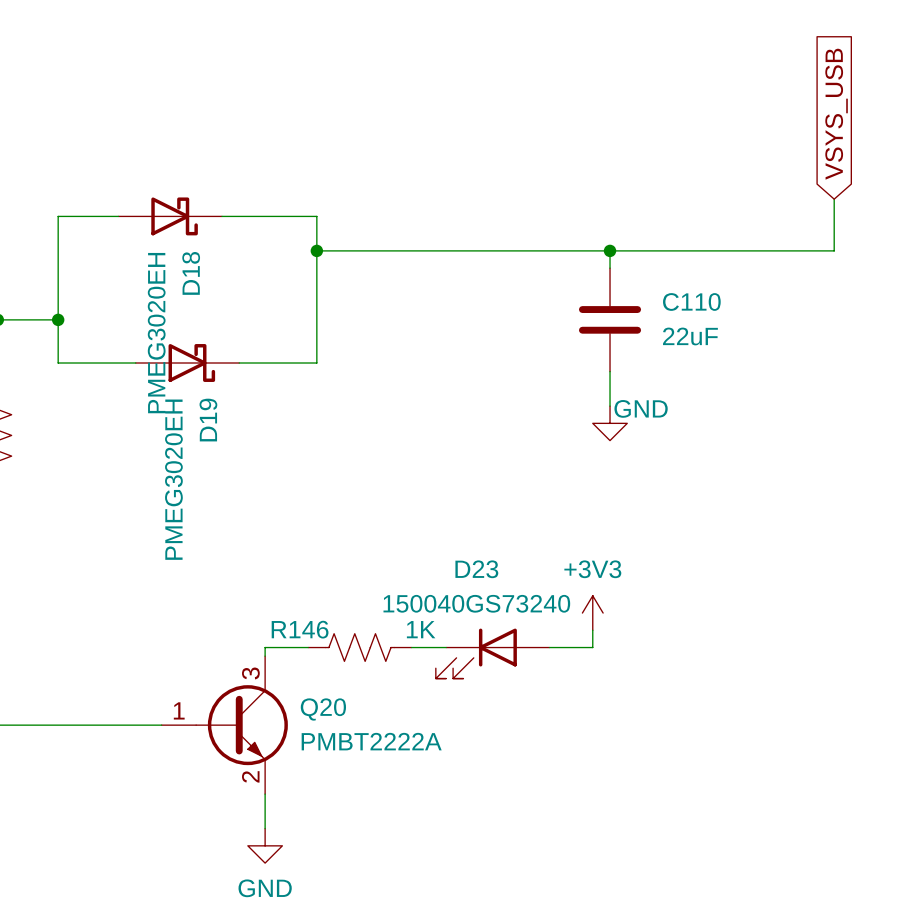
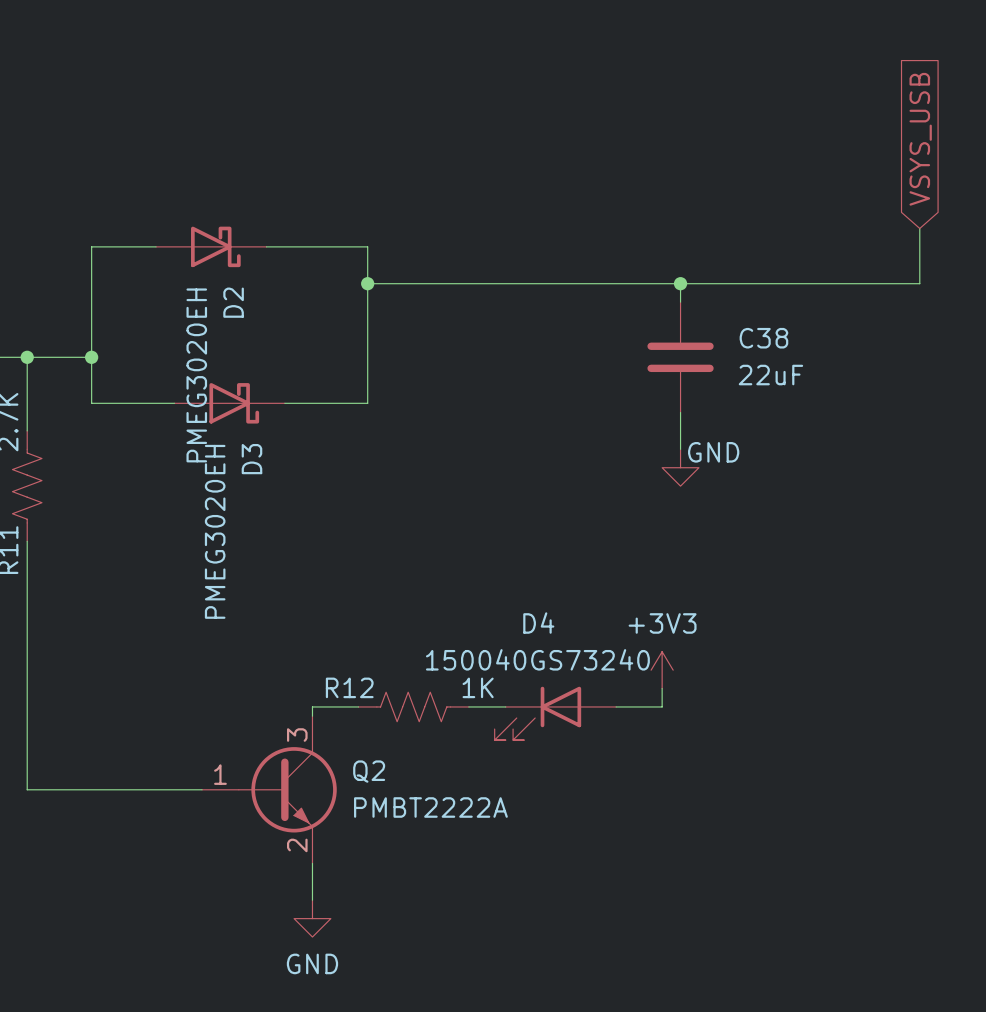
D18 name: D18 (191, 273) -> D2 (233, 302)
C110 name: C110 (691, 301) -> C38 (763, 338)
D19 name: D19 (208, 420) -> D3 (251, 459)
D23 name: D23 (476, 569) -> D4 (538, 623)
R146 name: R146 (300, 629) -> R12 (349, 687)
Q20 name: Q20 (323, 709) -> Q2 (369, 771)

